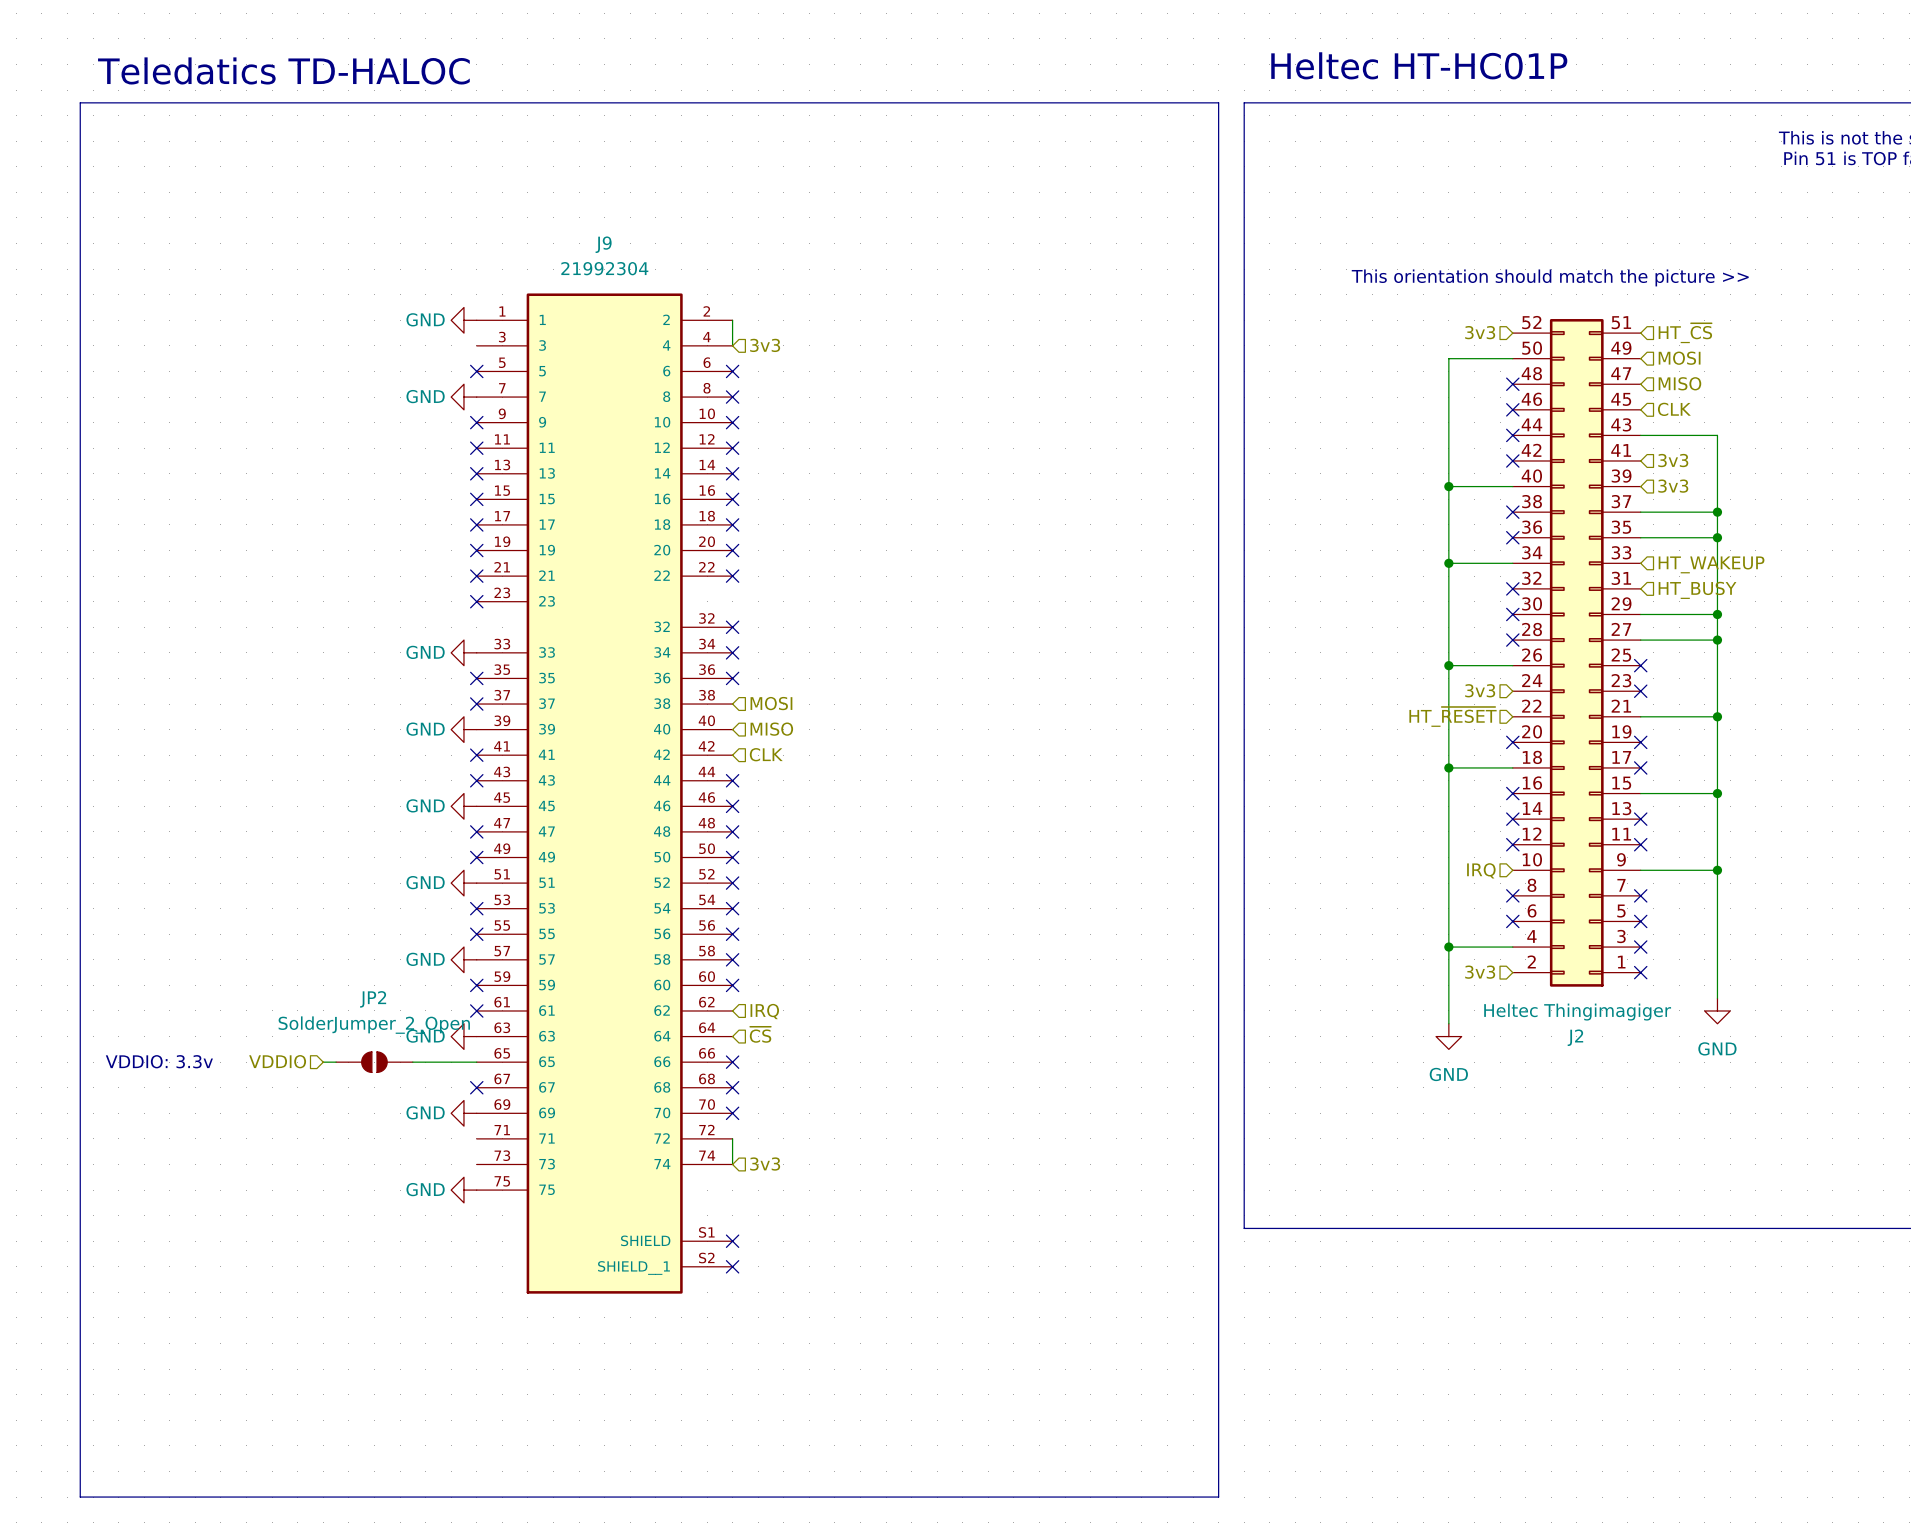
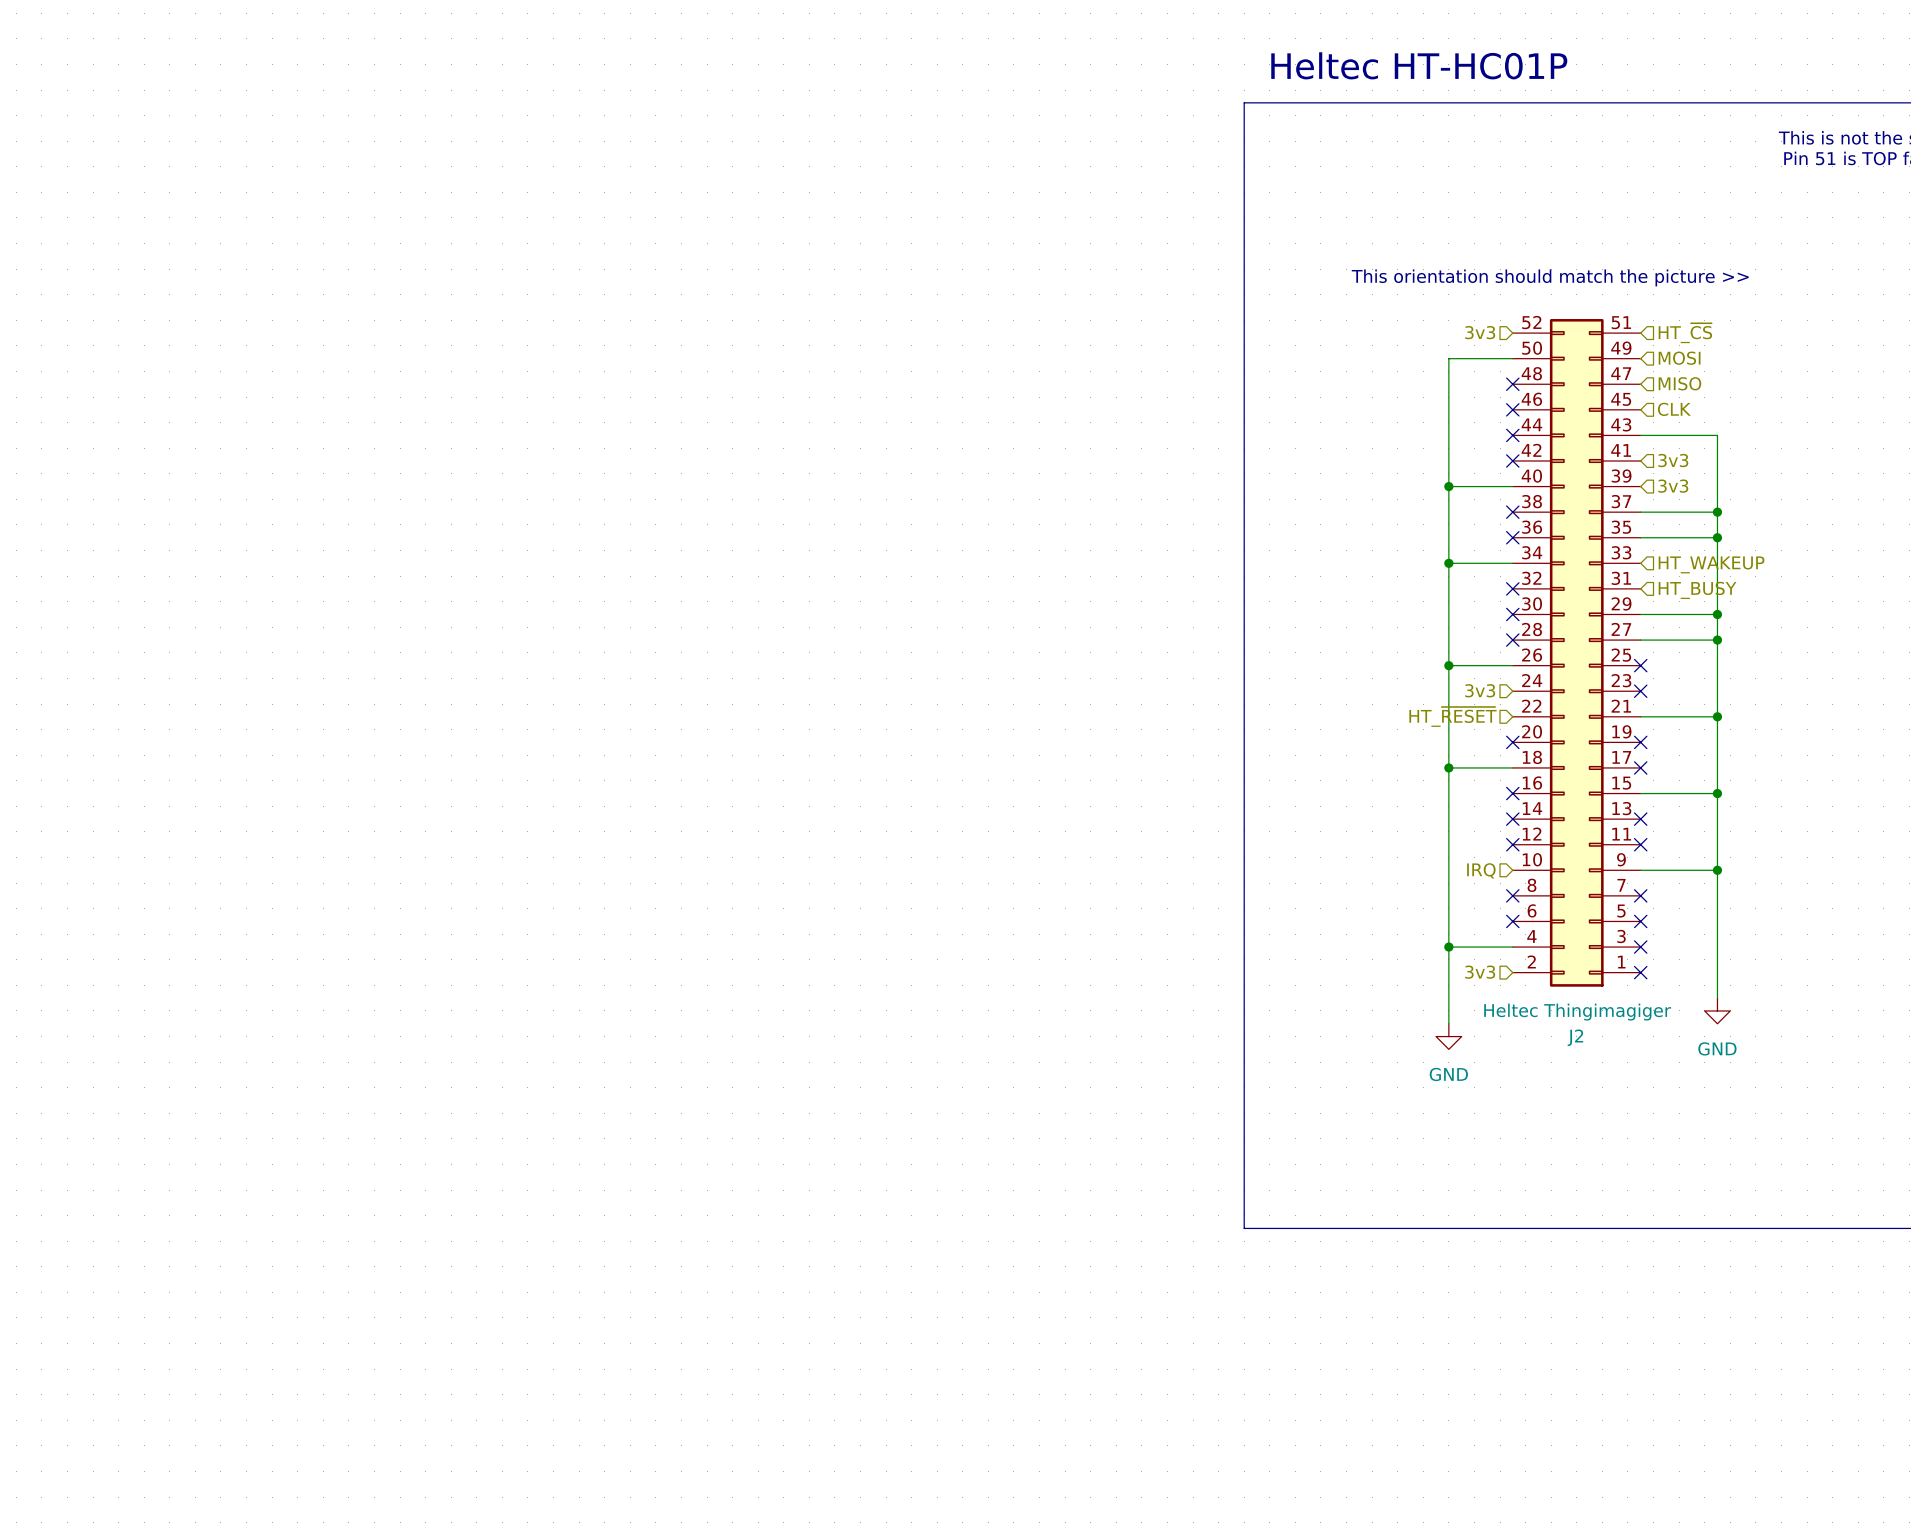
text: Teledatics TD-HALOC (283, 70) -> none
line: (80, 102) (1218, 102) (1218, 1497) (80, 1497) (80, 102) -> none
power symbol: GND (463, 320) -> none
wire: (732, 320) (732, 345) -> none
hierarchical label: 3v3 (765, 345) -> none
no-connect mark: (476, 371) -> none
no-connect mark: (732, 371) -> none
power symbol: GND (463, 397) -> none
no-connect mark: (732, 397) -> none
no-connect mark: (476, 422) -> none
no-connect mark: (732, 422) -> none
no-connect mark: (476, 448) -> none
no-connect mark: (732, 448) -> none
no-connect mark: (476, 473) -> none
no-connect mark: (732, 473) -> none
no-connect mark: (476, 499) -> none
no-connect mark: (732, 499) -> none
no-connect mark: (476, 524) -> none
no-connect mark: (732, 524) -> none
no-connect mark: (476, 550) -> none
no-connect mark: (732, 550) -> none
no-connect mark: (476, 576) -> none
no-connect mark: (732, 576) -> none
no-connect mark: (476, 601) -> none
no-connect mark: (732, 627) -> none
power symbol: GND (463, 652) -> none
no-connect mark: (732, 652) -> none
no-connect mark: (476, 678) -> none
no-connect mark: (732, 678) -> none
hierarchical label: MOSI (771, 703) -> none
no-connect mark: (476, 704) -> none
power symbol: GND (463, 729) -> none
hierarchical label: MISO (771, 729) -> none
hierarchical label: CLK (766, 754) -> none
no-connect mark: (476, 755) -> none
no-connect mark: (476, 780) -> none
no-connect mark: (732, 780) -> none
J9: 21992304 (604, 793) -> none
power symbol: GND (463, 806) -> none
no-connect mark: (732, 806) -> none
no-connect mark: (476, 831) -> none
no-connect mark: (732, 831) -> none
no-connect mark: (476, 857) -> none
no-connect mark: (732, 857) -> none
power symbol: GND (463, 883) -> none
no-connect mark: (732, 883) -> none
no-connect mark: (476, 908) -> none
no-connect mark: (732, 908) -> none
no-connect mark: (476, 934) -> none
no-connect mark: (732, 934) -> none
power symbol: GND (463, 959) -> none
no-connect mark: (732, 959) -> none
no-connect mark: (476, 985) -> none
no-connect mark: (732, 985) -> none
no-connect mark: (476, 1010) -> none
hierarchical label: IRQ (764, 1011) -> none
hierarchical label: ~{CS} (760, 1034) -> none
power symbol: GND (463, 1036) -> none
text: VDDIO: 3.3v (159, 1061) -> none
hierarchical label: VDDIO (277, 1061) -> none
wire: (323, 1062) (336, 1062) -> none
JP2: SolderJumper_2_Open (374, 1062) -> none
wire: (412, 1062) (476, 1062) -> none
no-connect mark: (732, 1062) -> none
no-connect mark: (476, 1087) -> none
no-connect mark: (732, 1087) -> none
power symbol: GND (463, 1113) -> none
no-connect mark: (732, 1113) -> none
wire: (732, 1138) (732, 1164) -> none
hierarchical label: 3v3 (765, 1164) -> none
power symbol: GND (463, 1190) -> none
no-connect mark: (732, 1241) -> none
no-connect mark: (732, 1266) -> none

